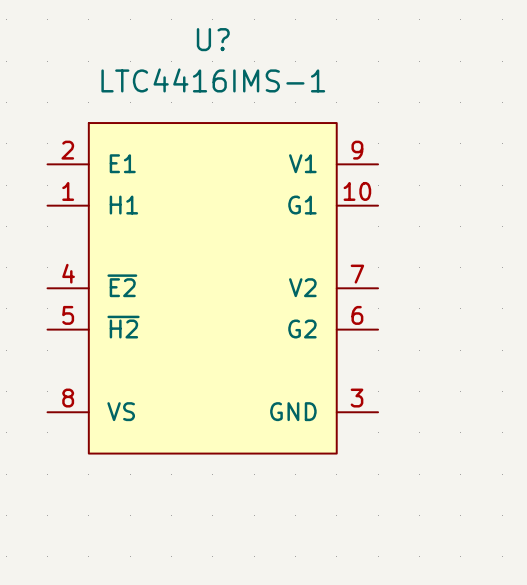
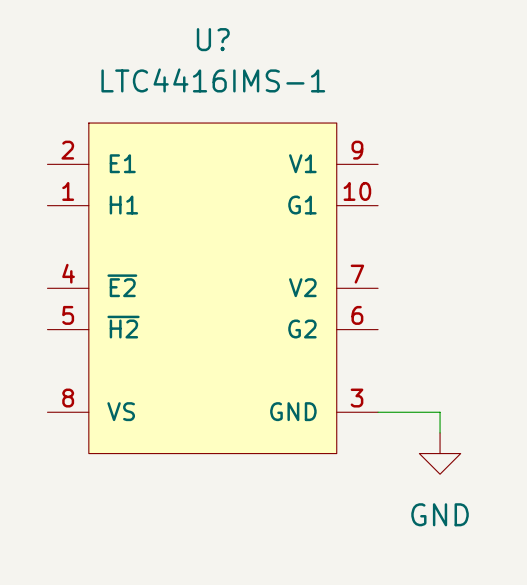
wire: none -> (378, 412) (440, 412) (440, 432)
power symbol: none -> GND (440, 453)

